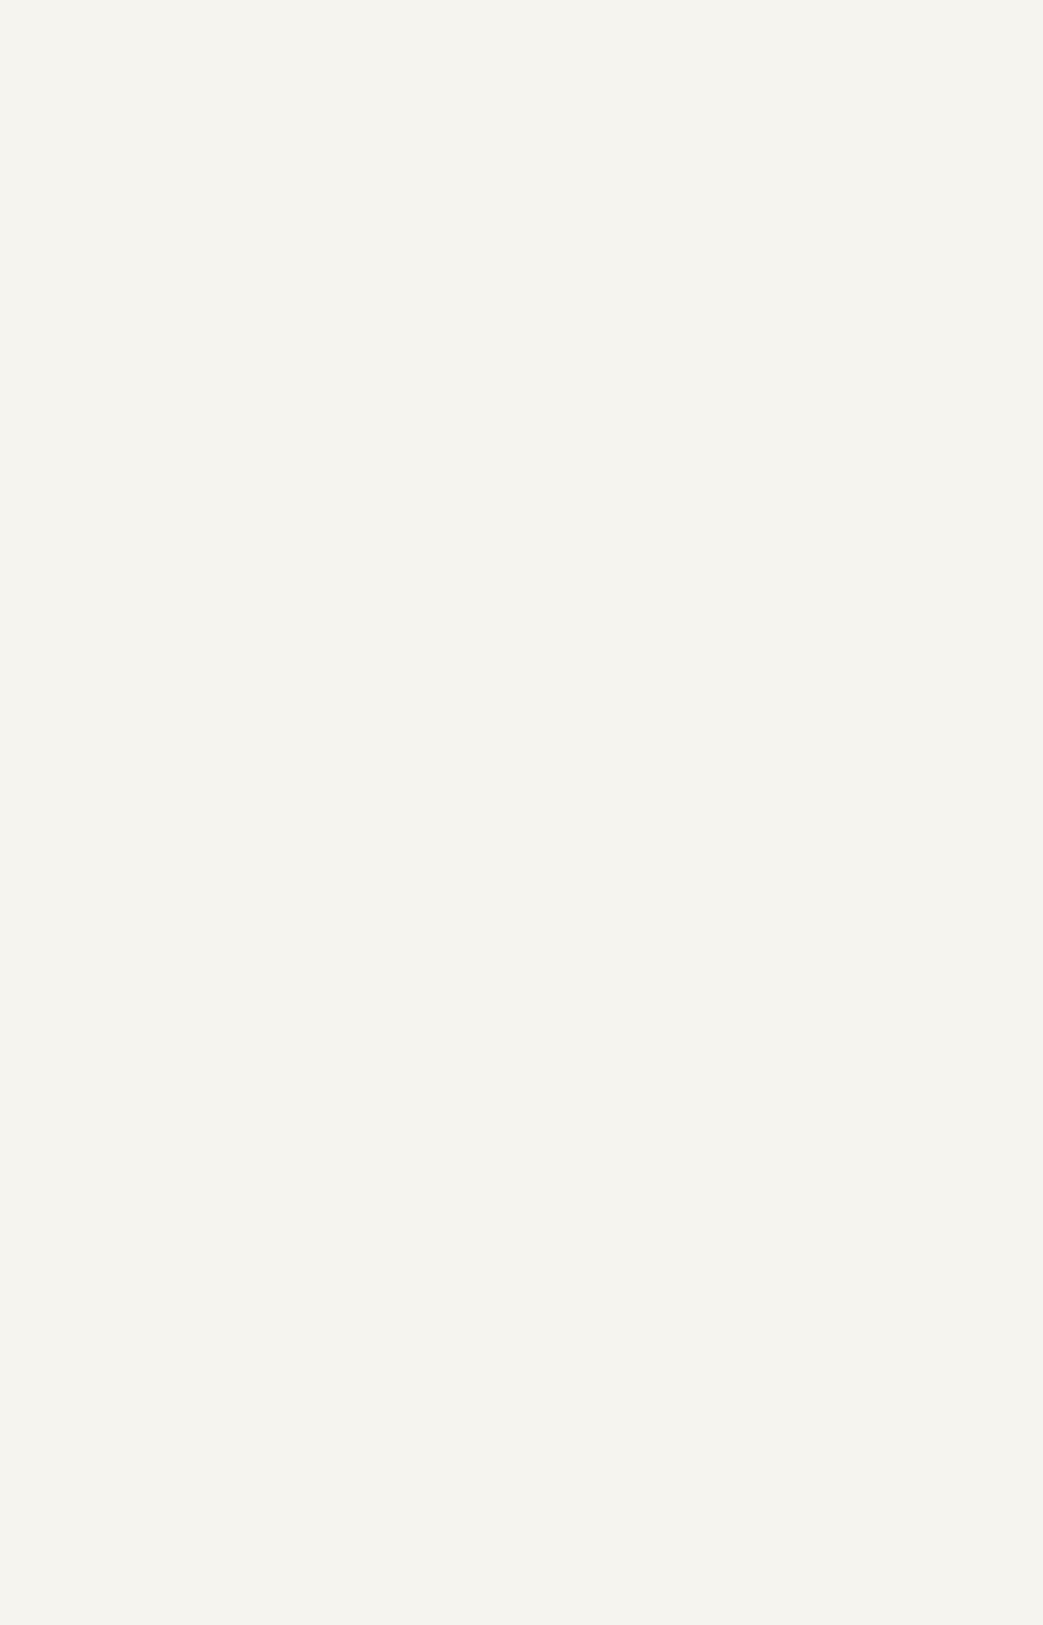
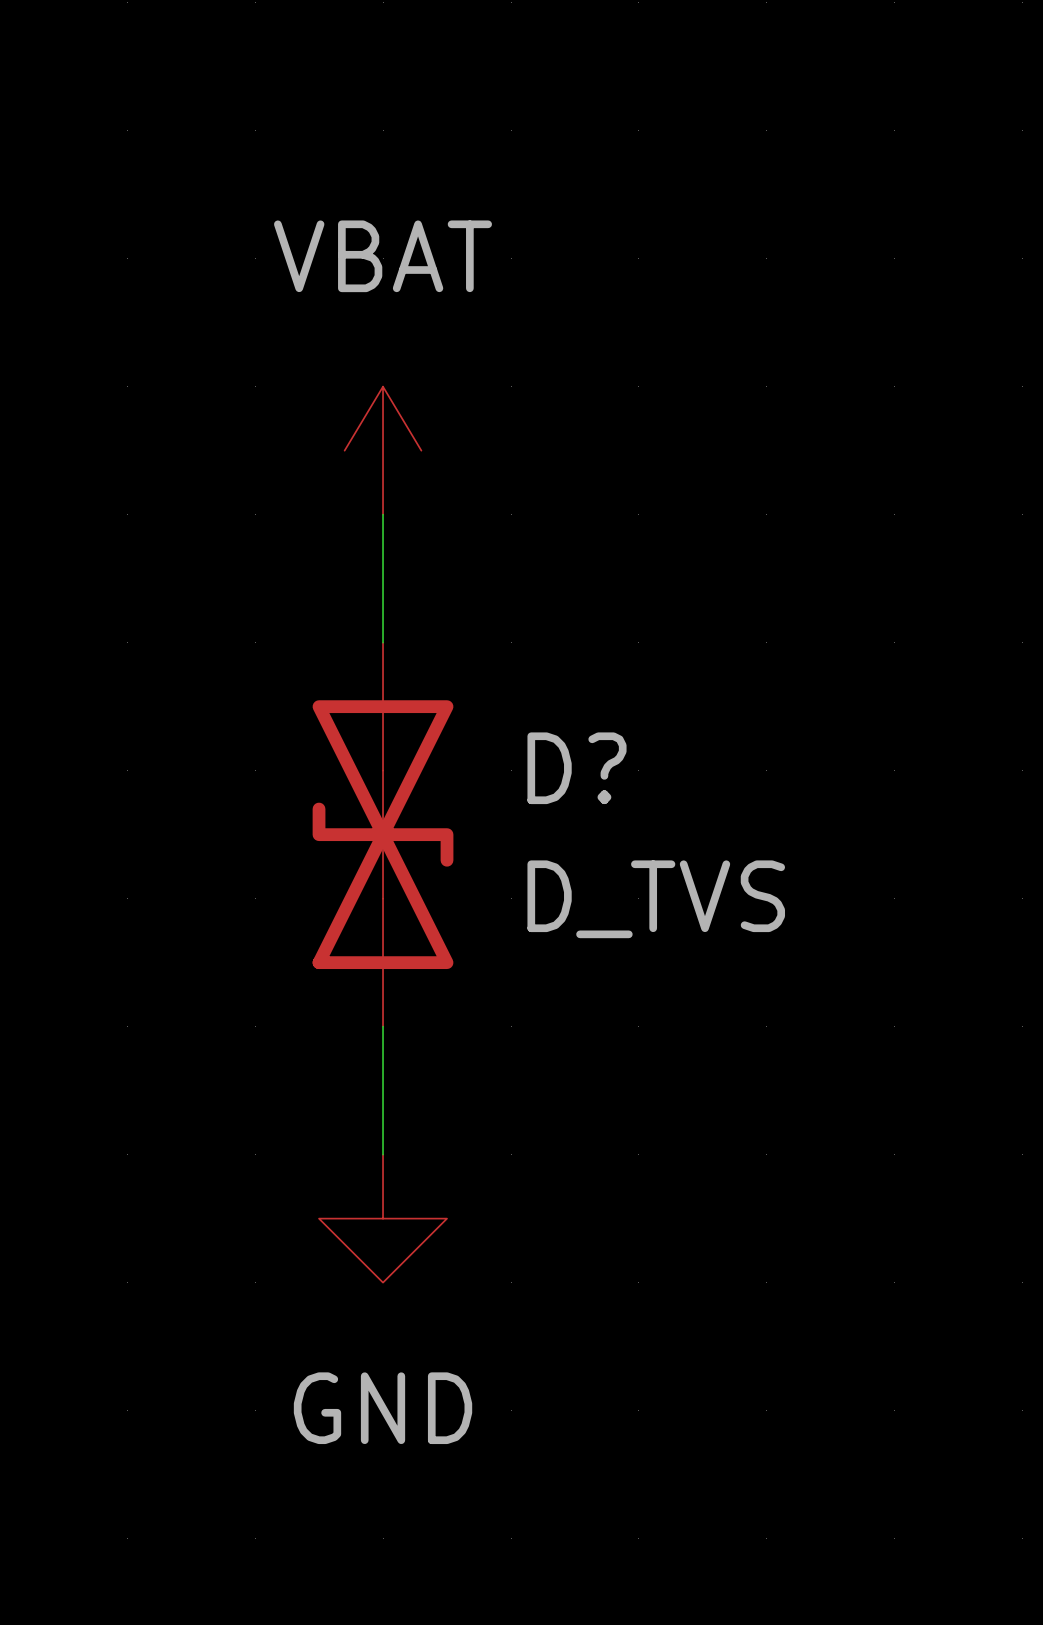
power symbol: none -> VBAT (383, 450)
wire: none -> (383, 514) (383, 642)
D?: none -> D_TVS (383, 834)
wire: none -> (383, 1026) (383, 1154)
power symbol: none -> GND (383, 1218)

